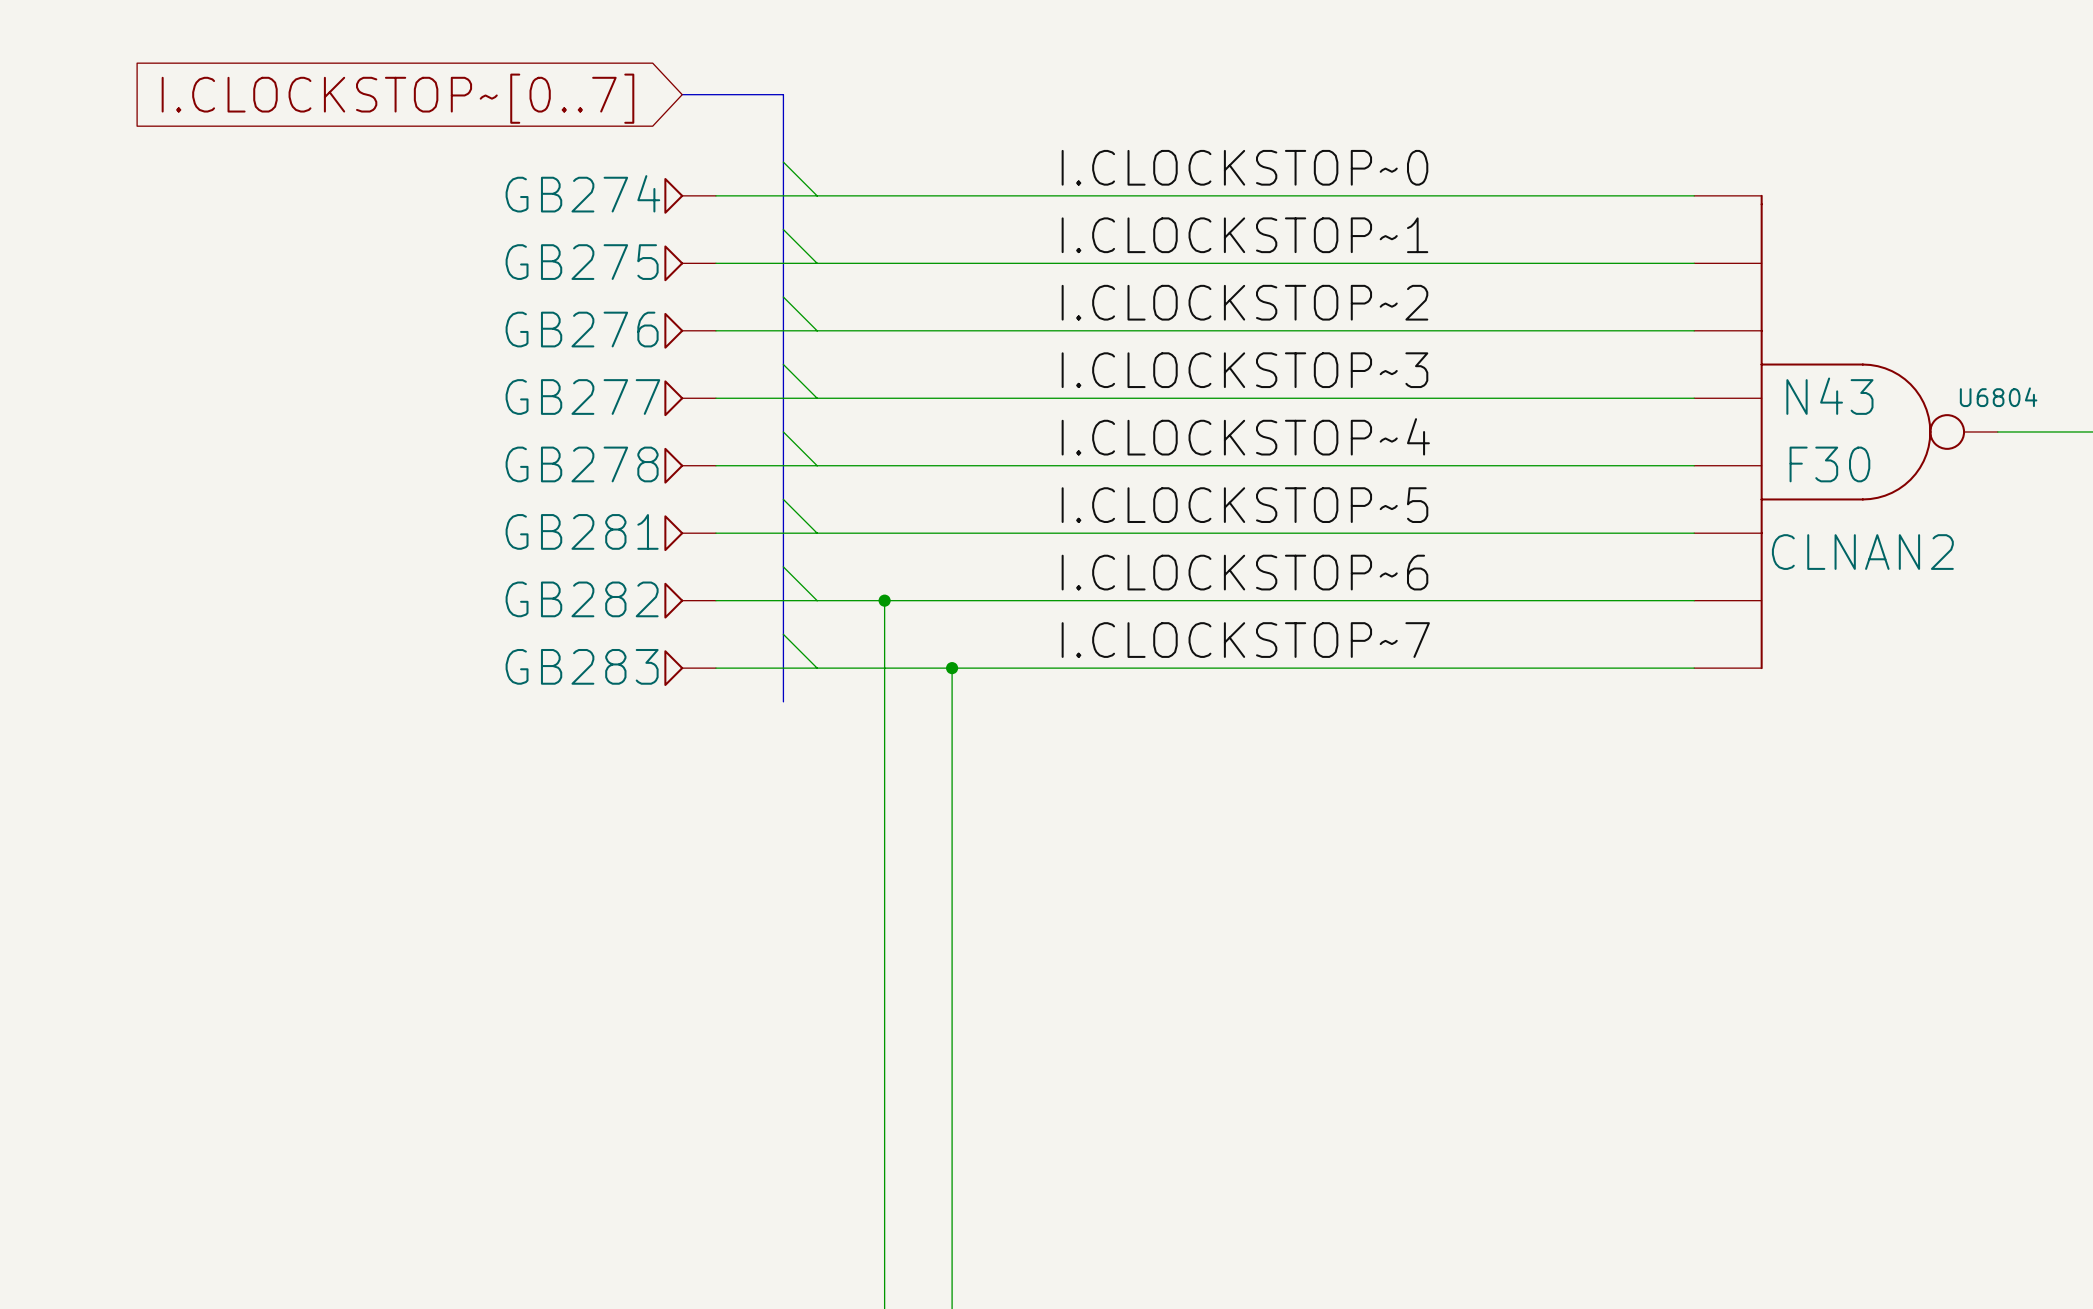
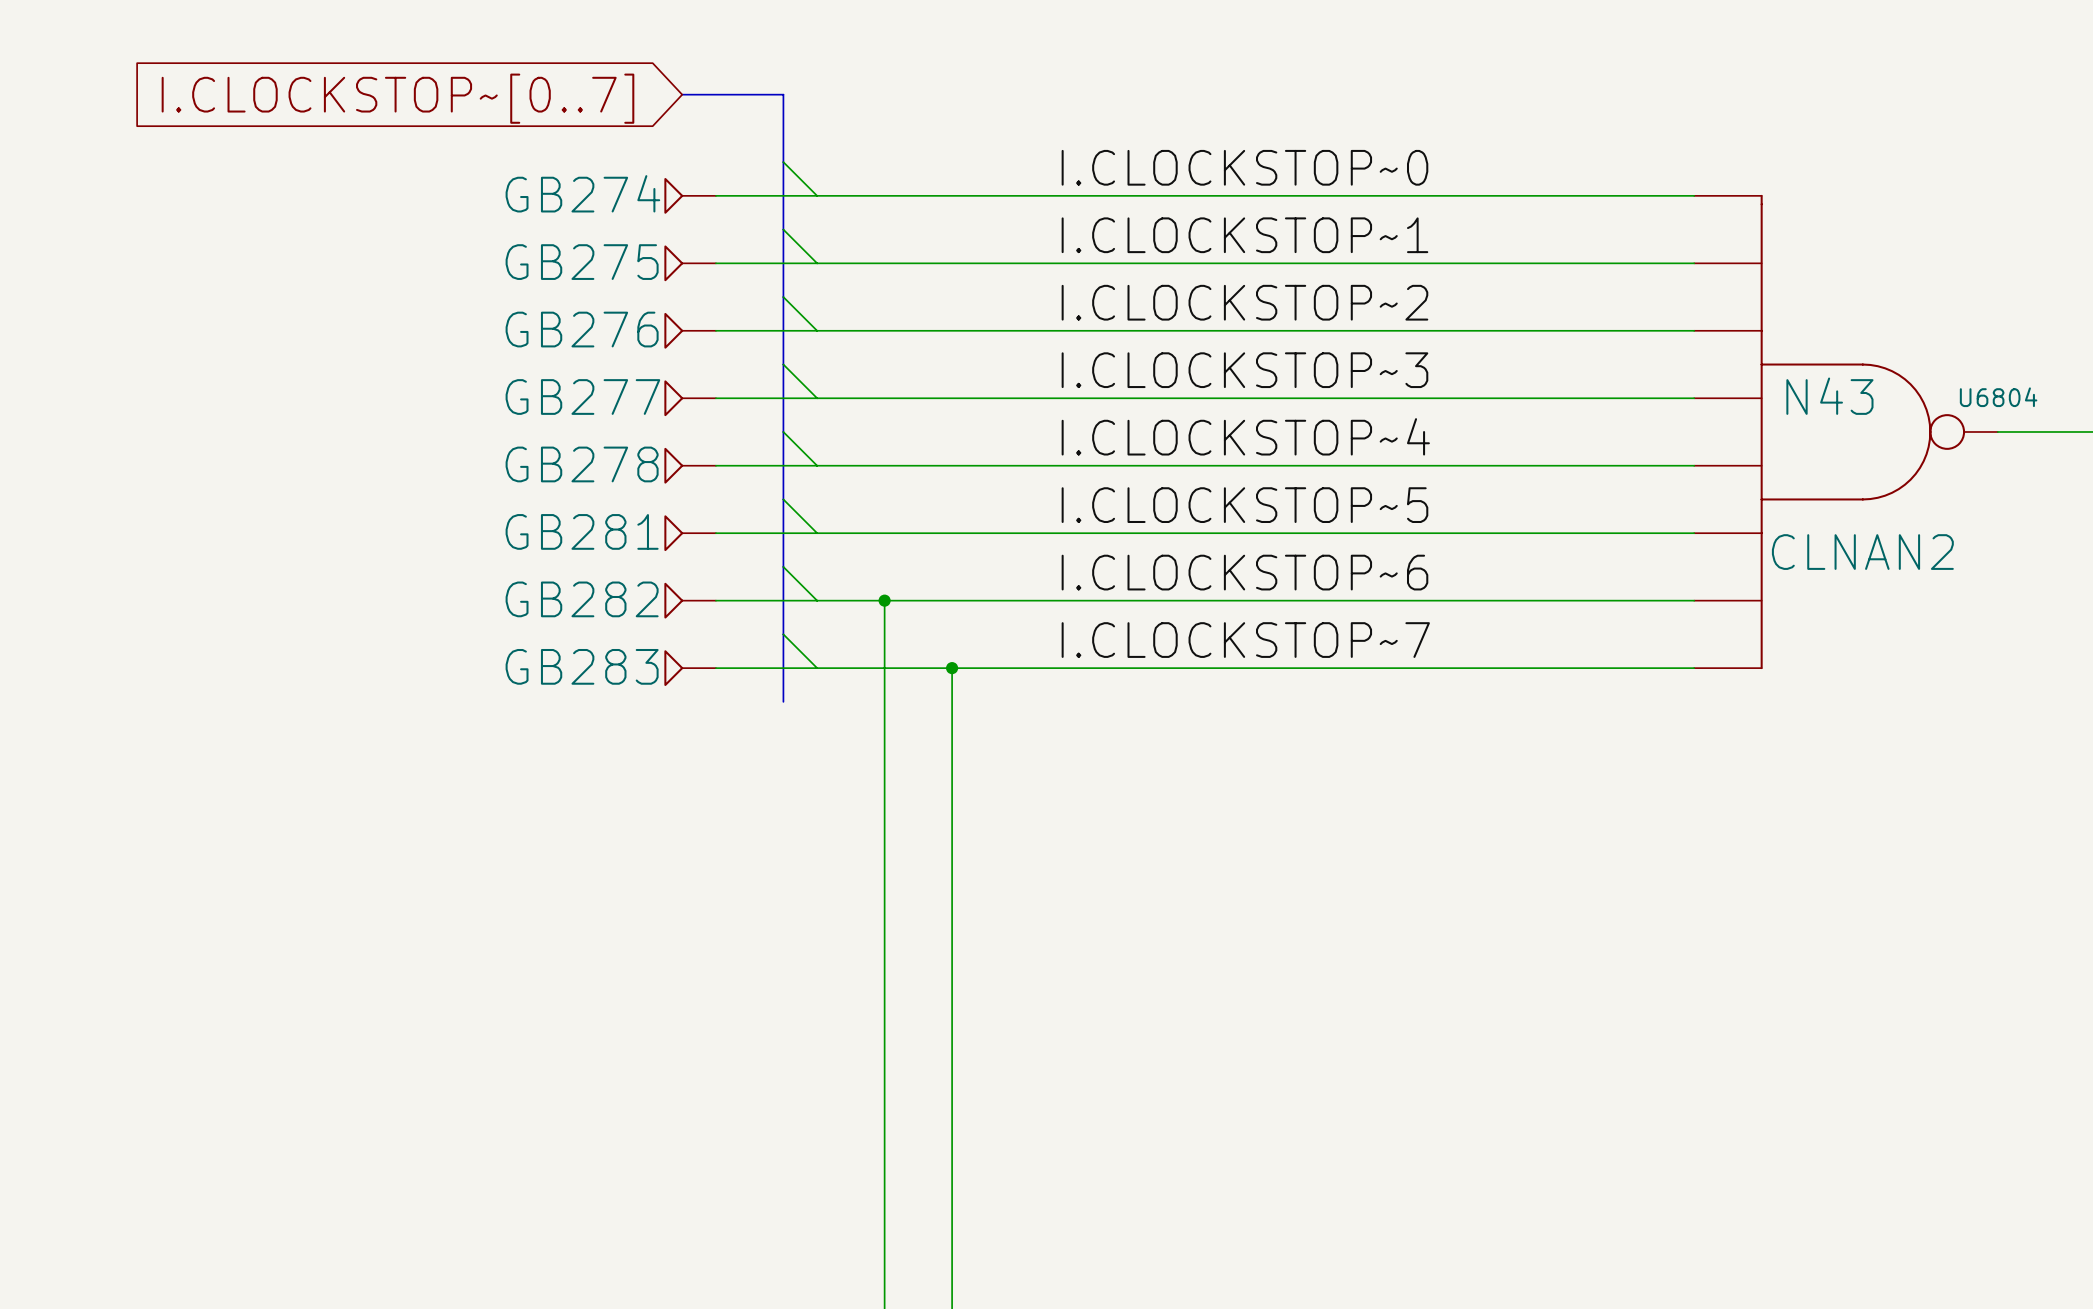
U6804 value: F30 (1829, 464) -> none

